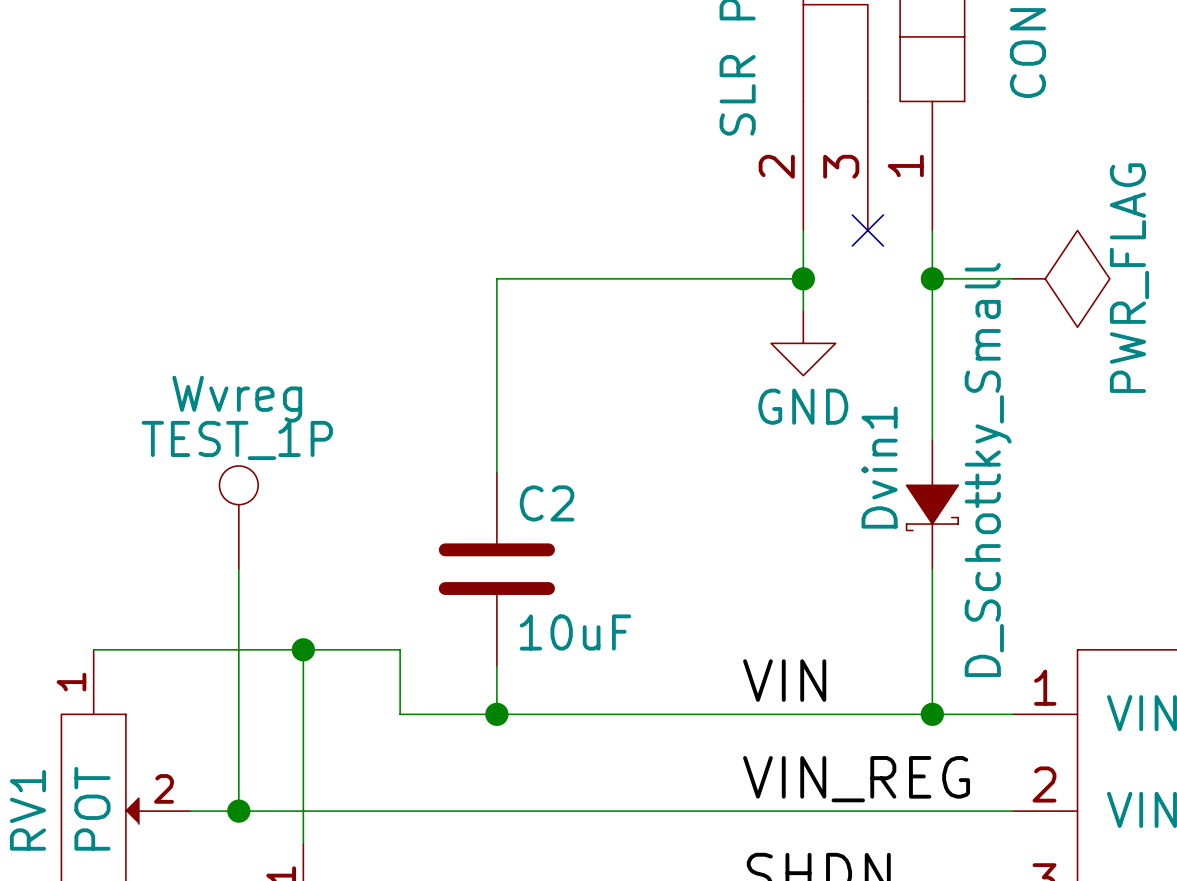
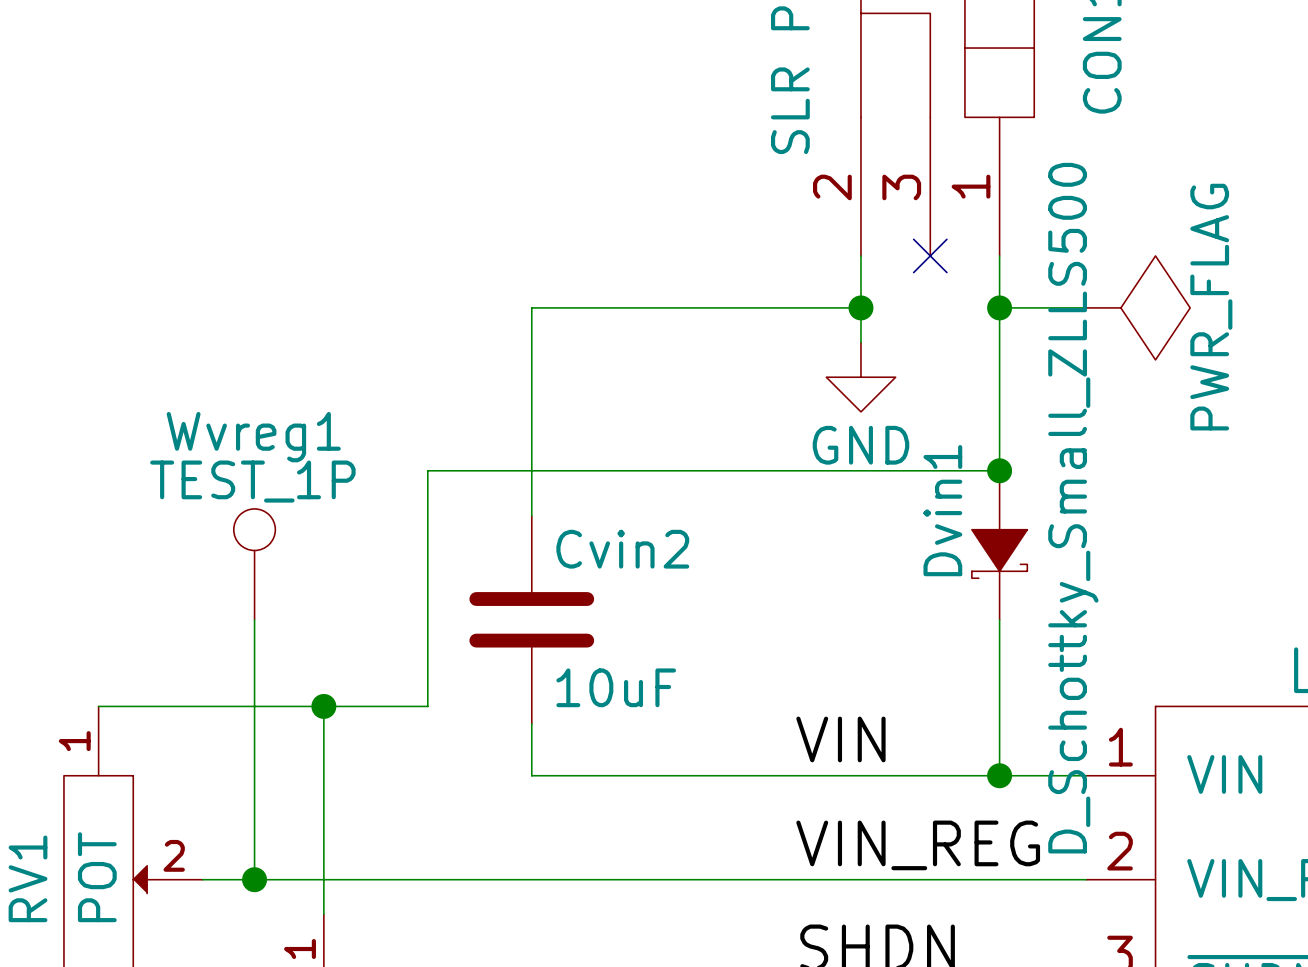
Wvreg name: Wvreg (237, 399) -> Wvreg1 (253, 437)
junction: none -> (999, 470)
Dvin1 value: D_Schottky_Small (988, 470) -> D_Schottky_Small_ZLLS500 (1073, 508)
C2 name: C2 (547, 503) -> Cvin2 (622, 549)
wire: (400, 649) (400, 714) (496, 714) -> (427, 706) (427, 470) (999, 470)
junction: (496, 714) -> none

